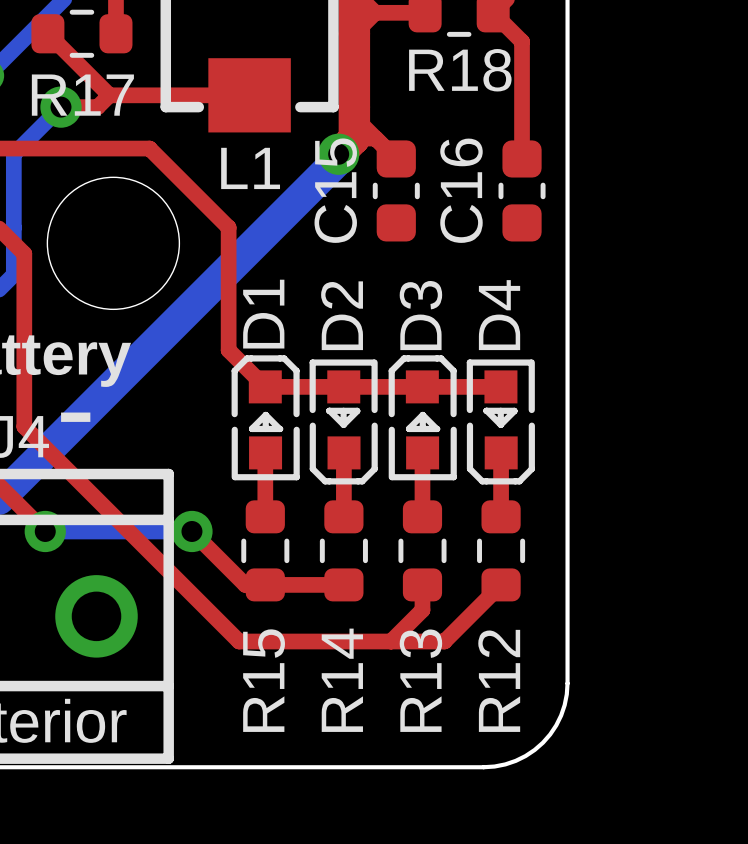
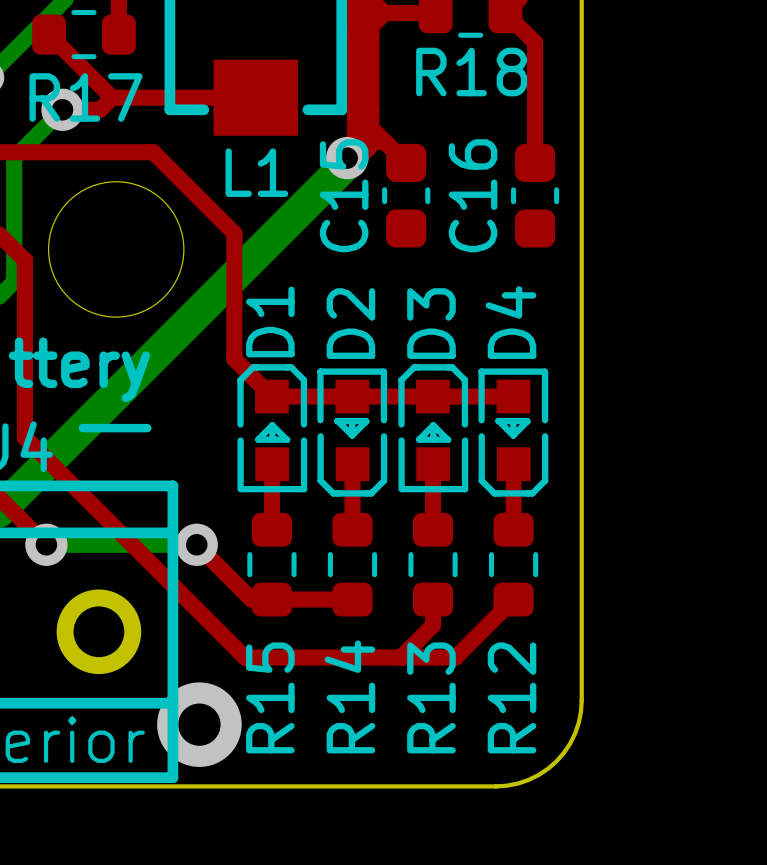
via: none -> (199, 724)

